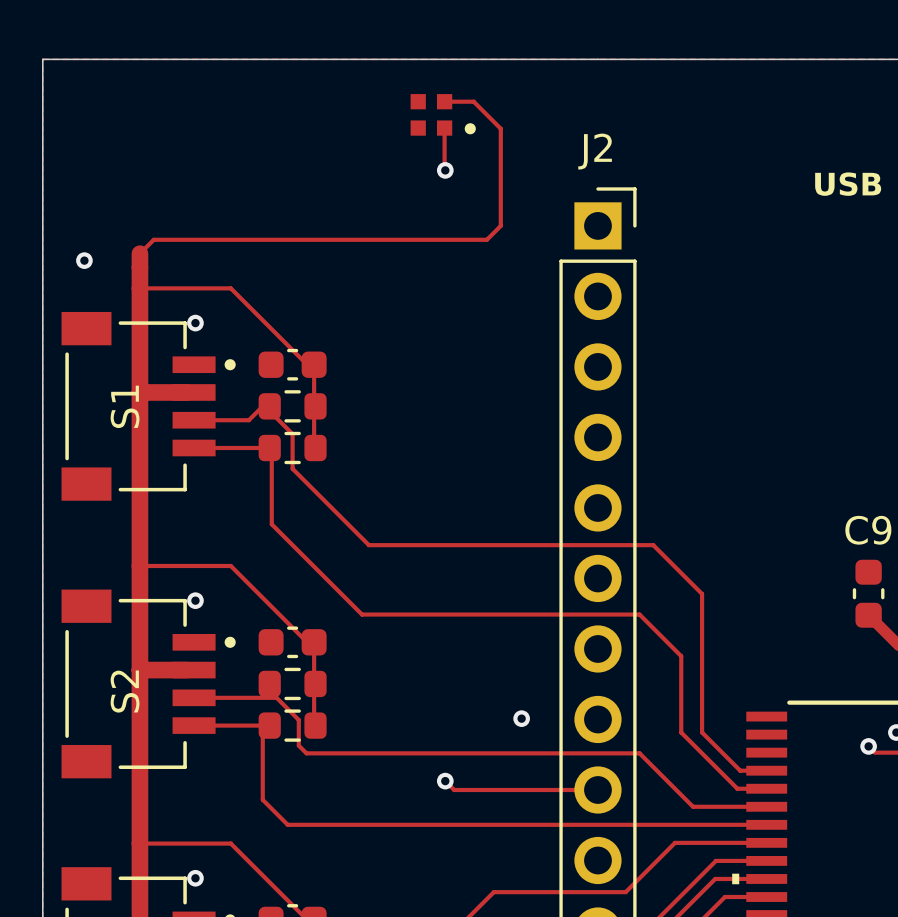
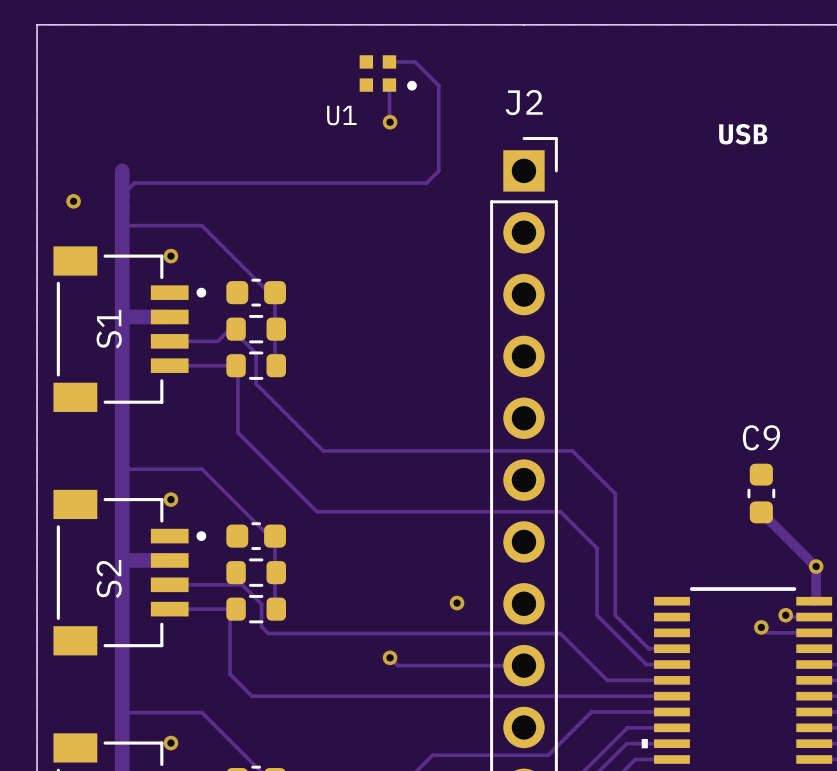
U1 name: none -> U1 (341, 115)
track: none -> (122, 170) (122, 195)

